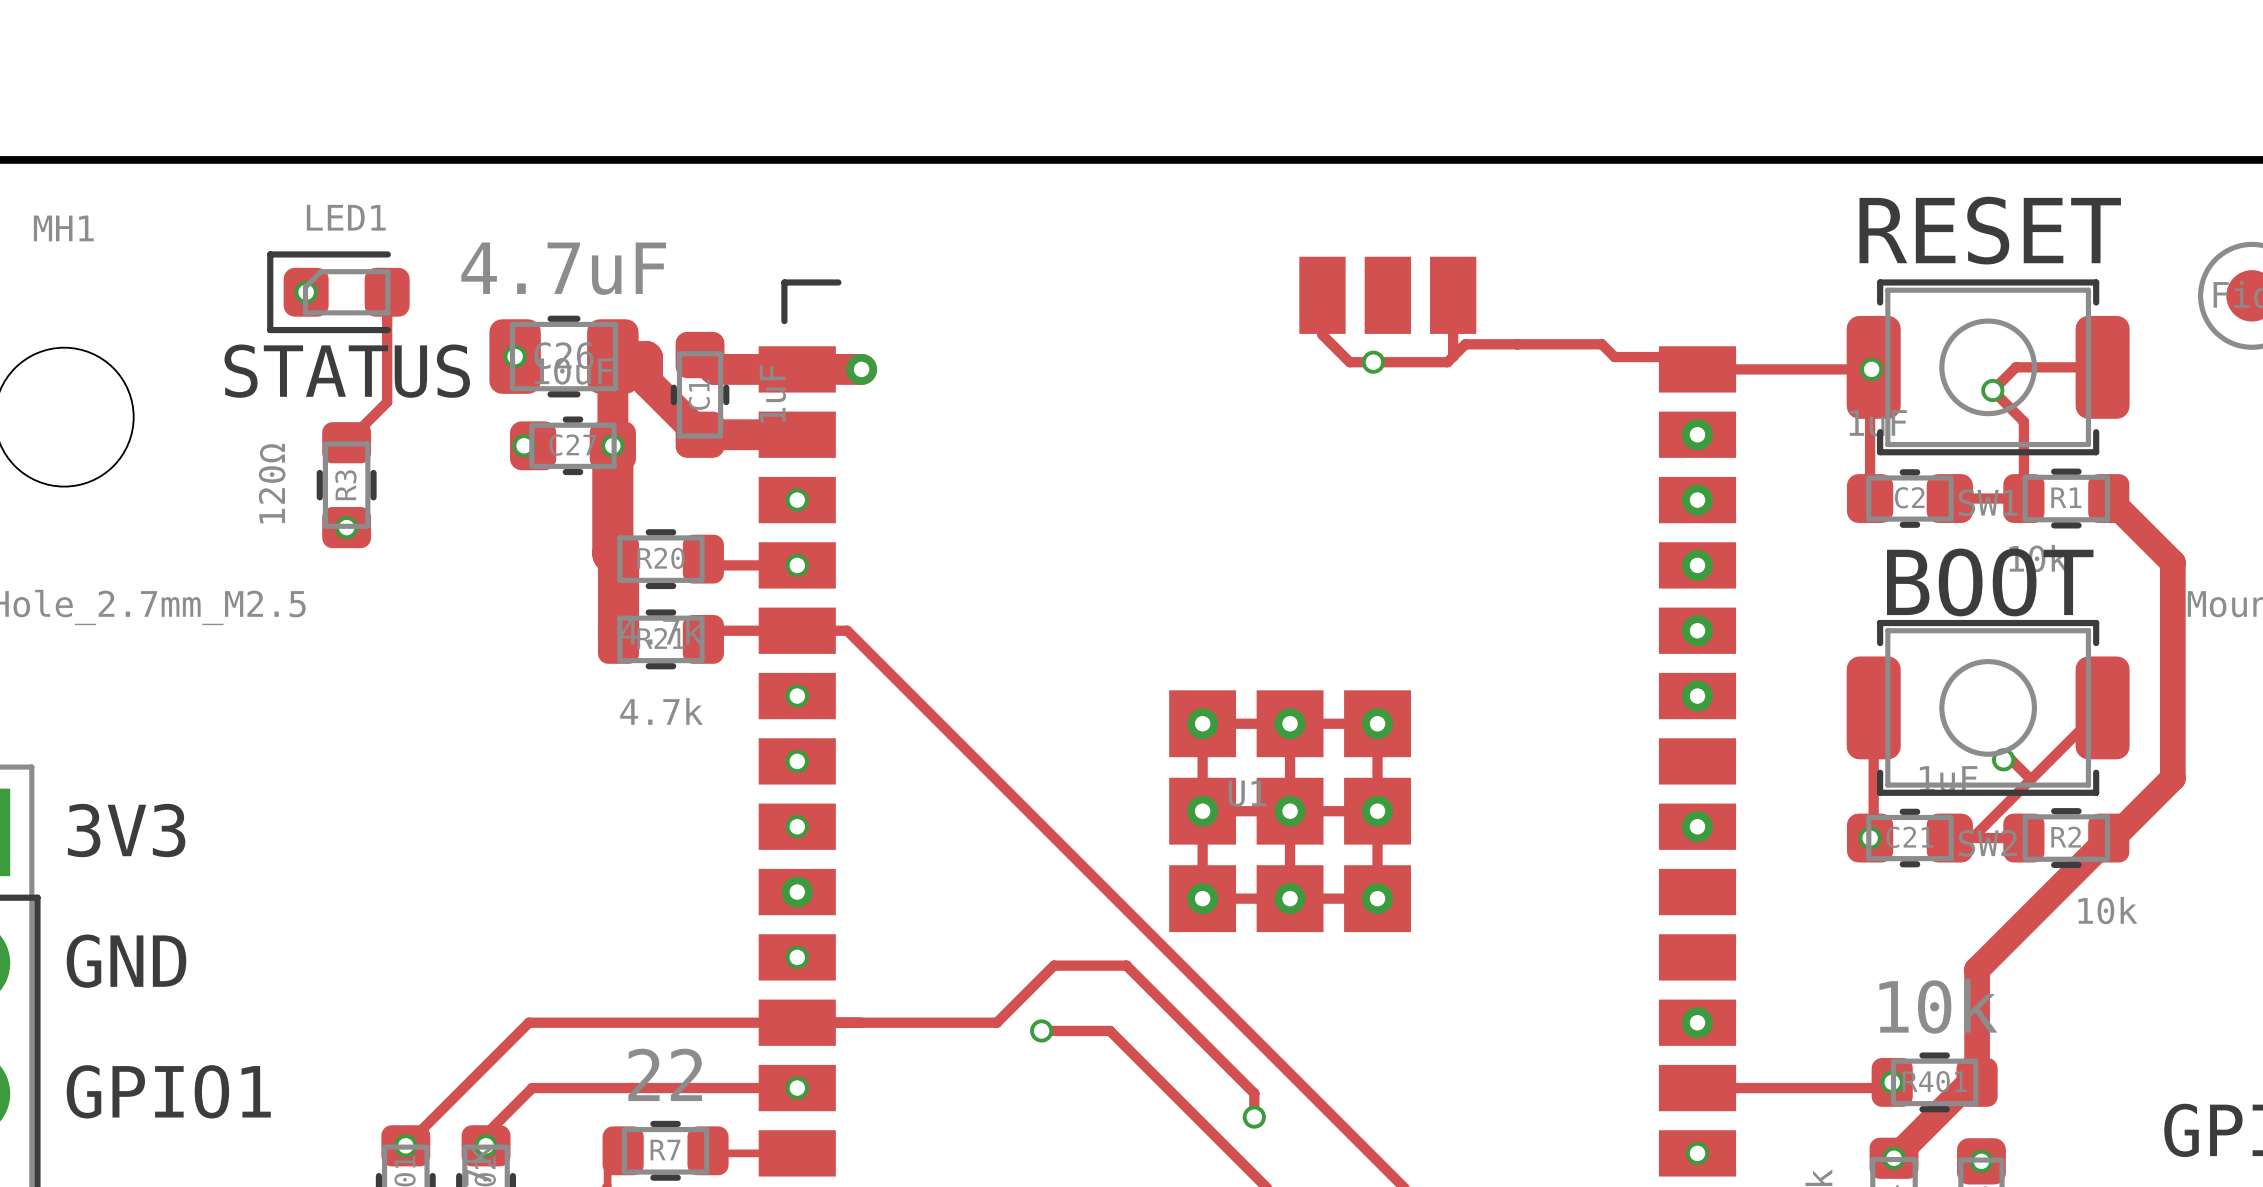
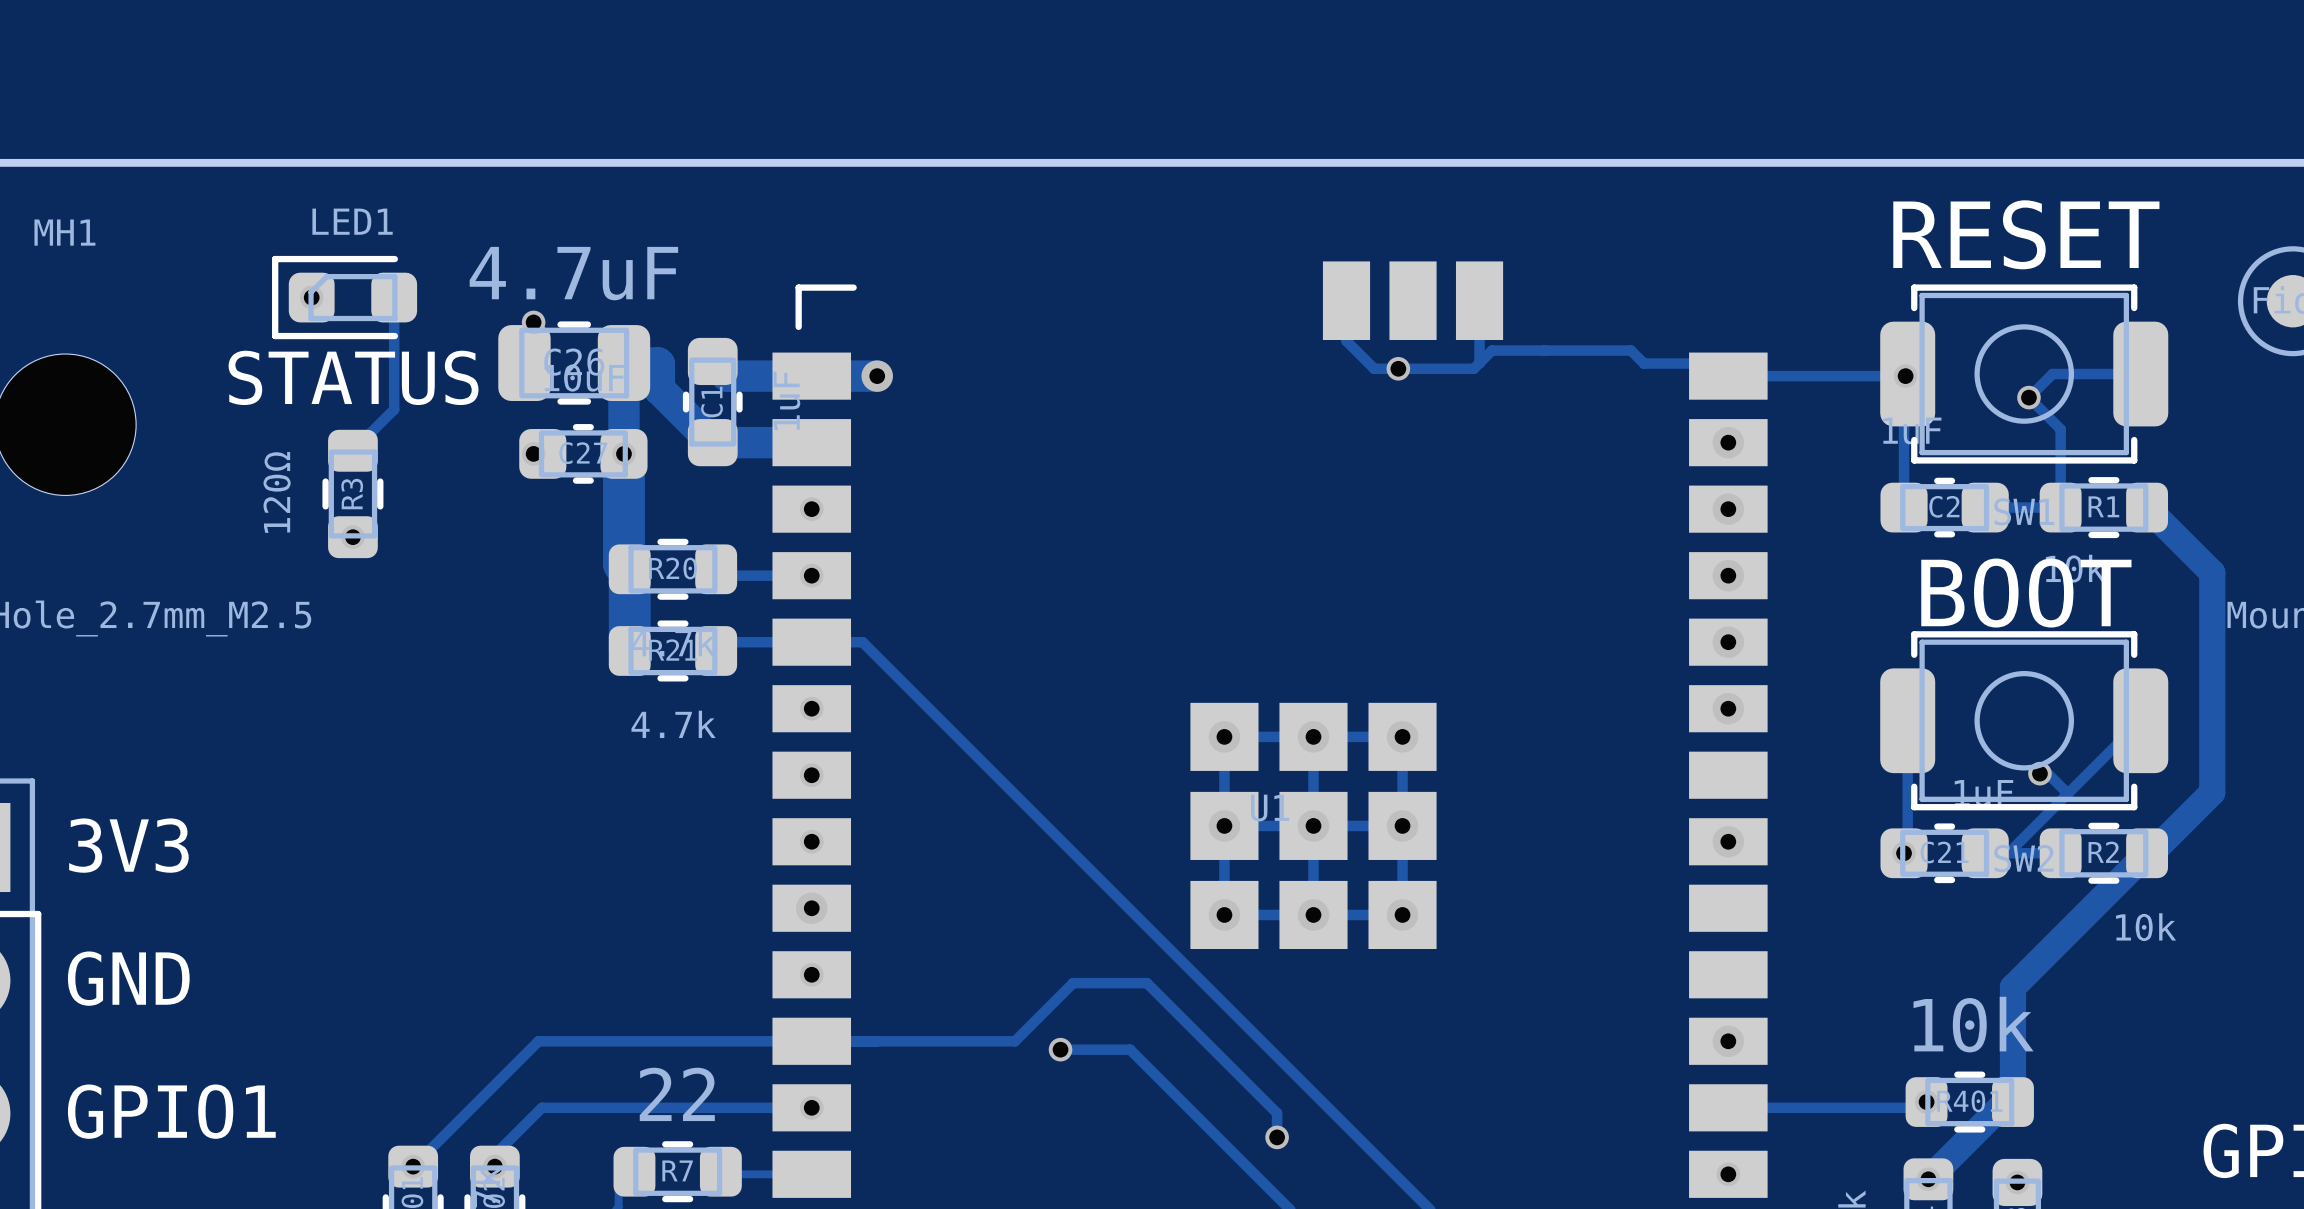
via position: (515, 356) -> (533, 322)

